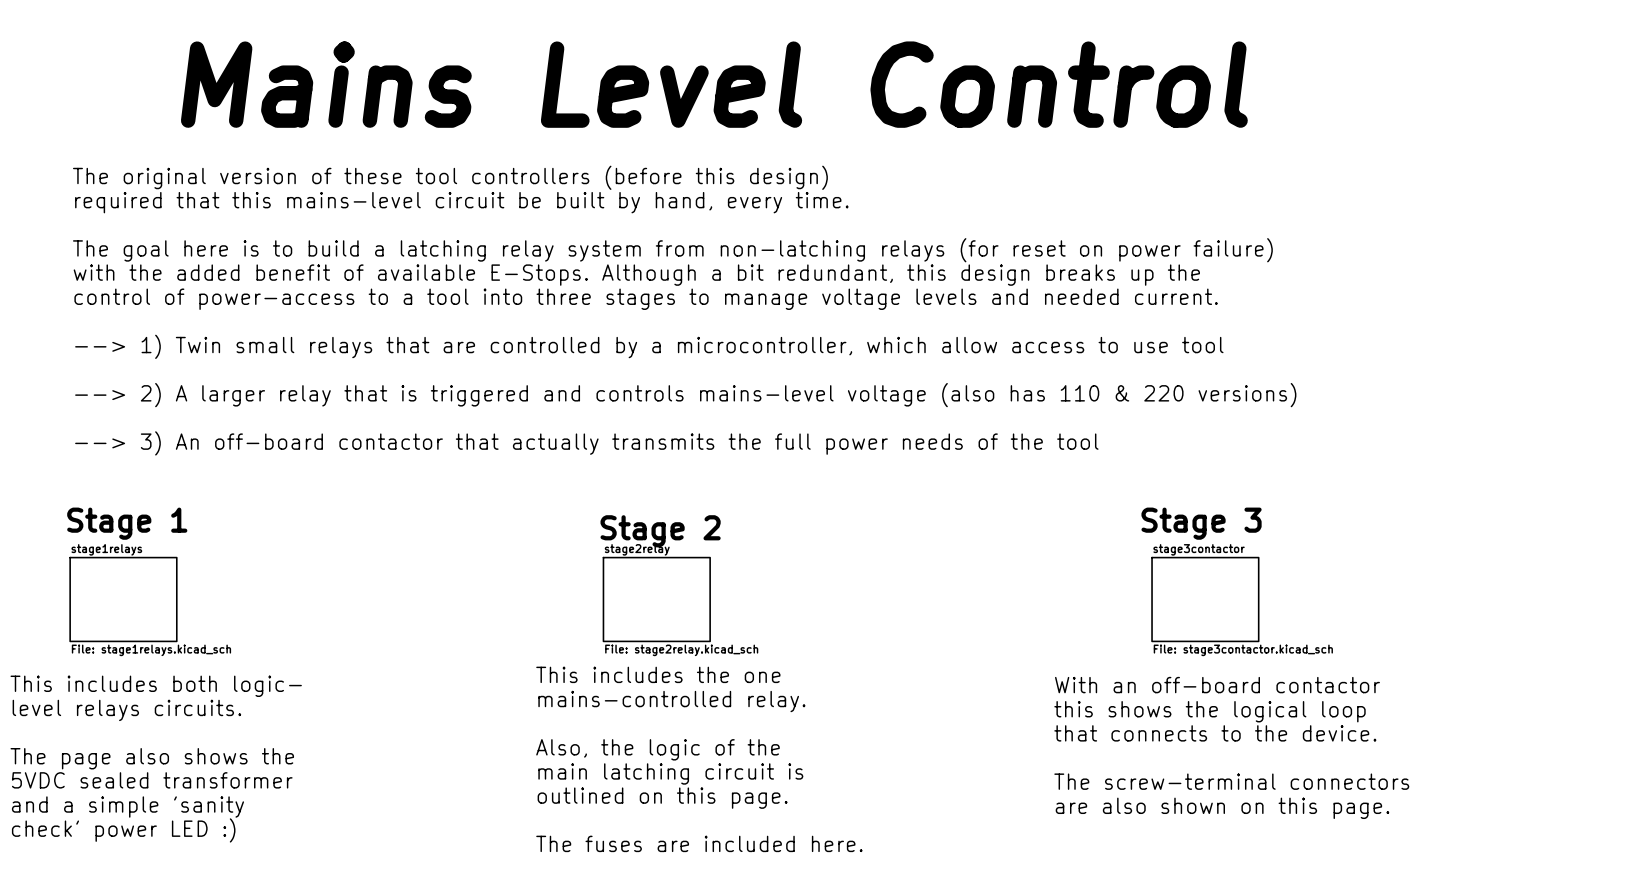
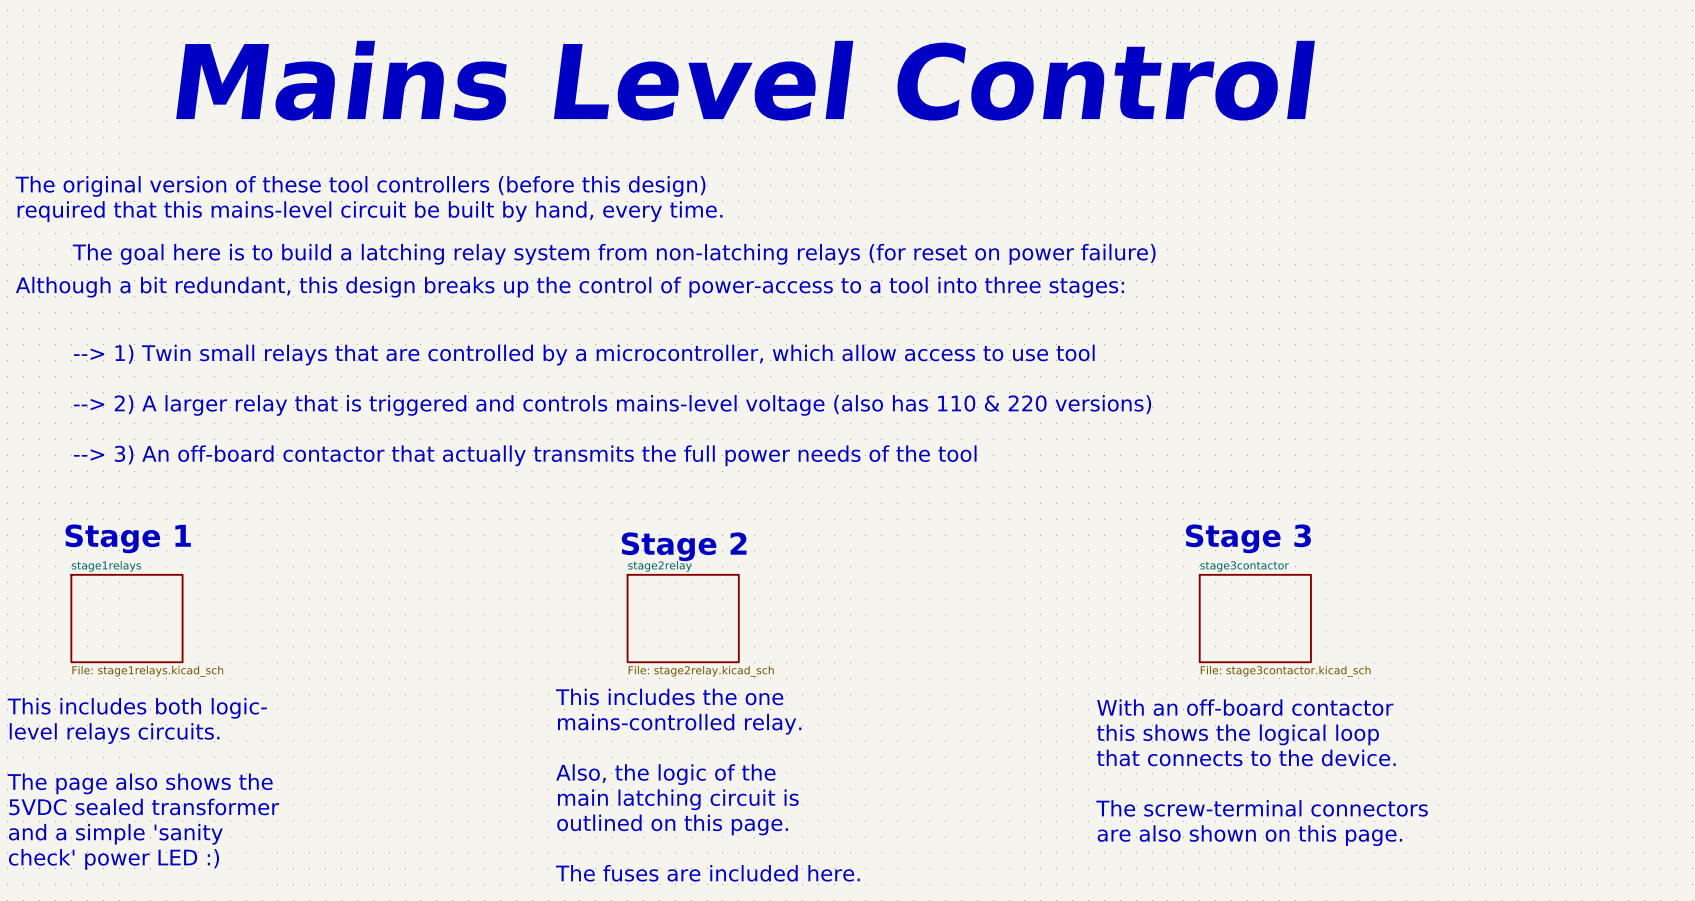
text position: The original version of these tool controllers (before this design) (450, 177) -> The original version of these tool controllers (before this design) (360, 186)
text position: required that this mains-level circuit be built by hand, every time. (461, 202) -> required that this mains-level circuit be built by hand, every time. (370, 211)
text: with the added benefit of available E-Stops. Although a bit redundant, this design breaks up the (636, 275) -> none
text: none -> Although a bit redundant, this design breaks up the control of power-access to a tool into three stages: (569, 287)
text: control of power-access to a tool into three stages to manage voltage levels and needed current. (646, 299) -> none

